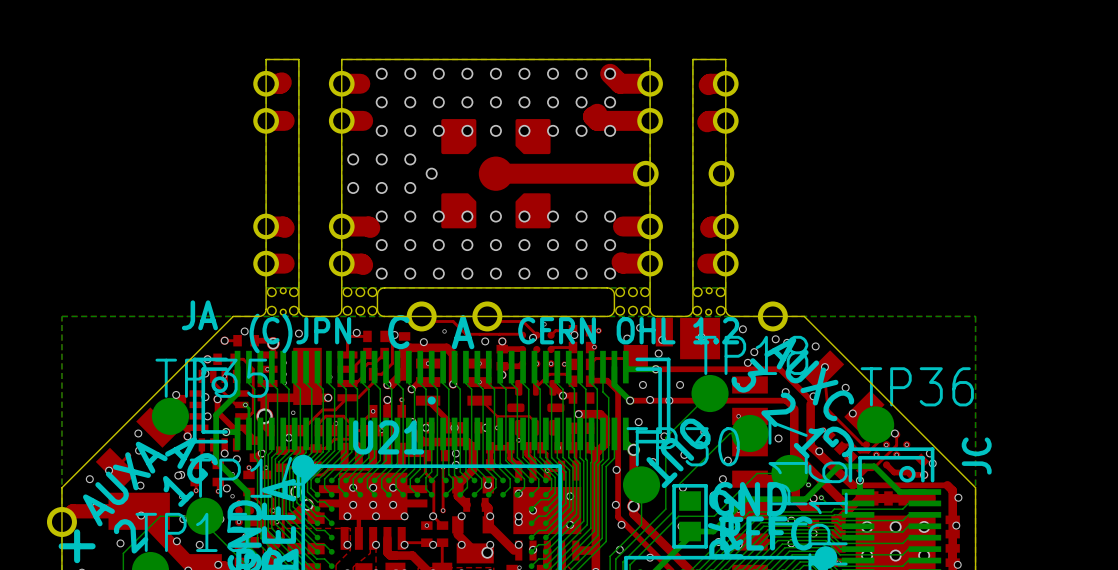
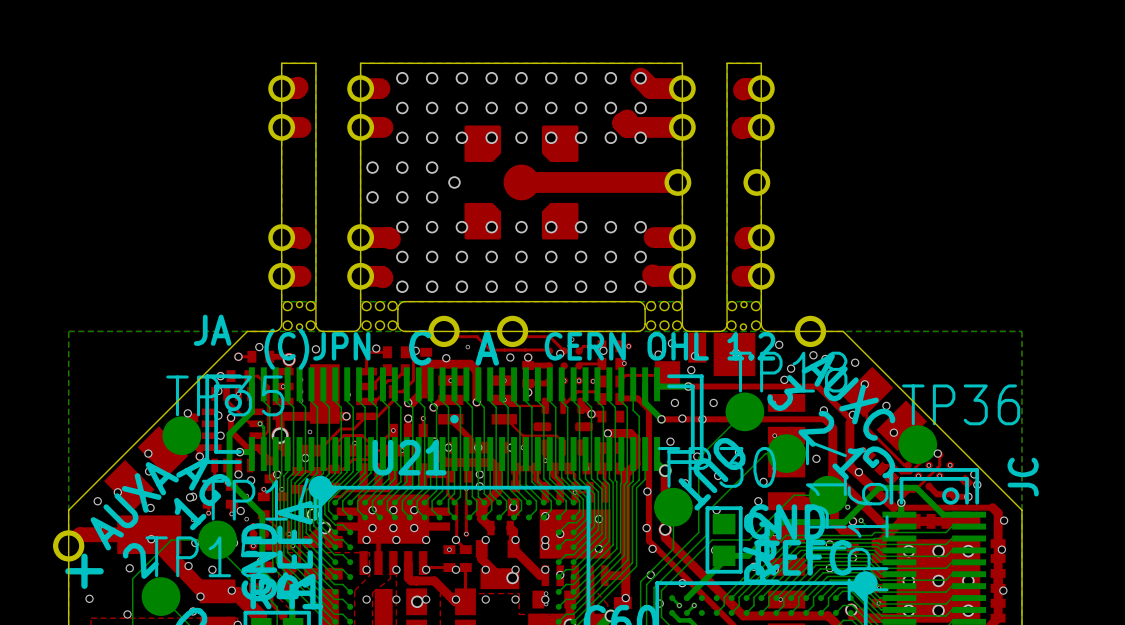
part footprint: [803, 350, 885, 432] -> [842, 366, 928, 452]
part footprint: [95, 407, 177, 489] -> [104, 426, 189, 511]

